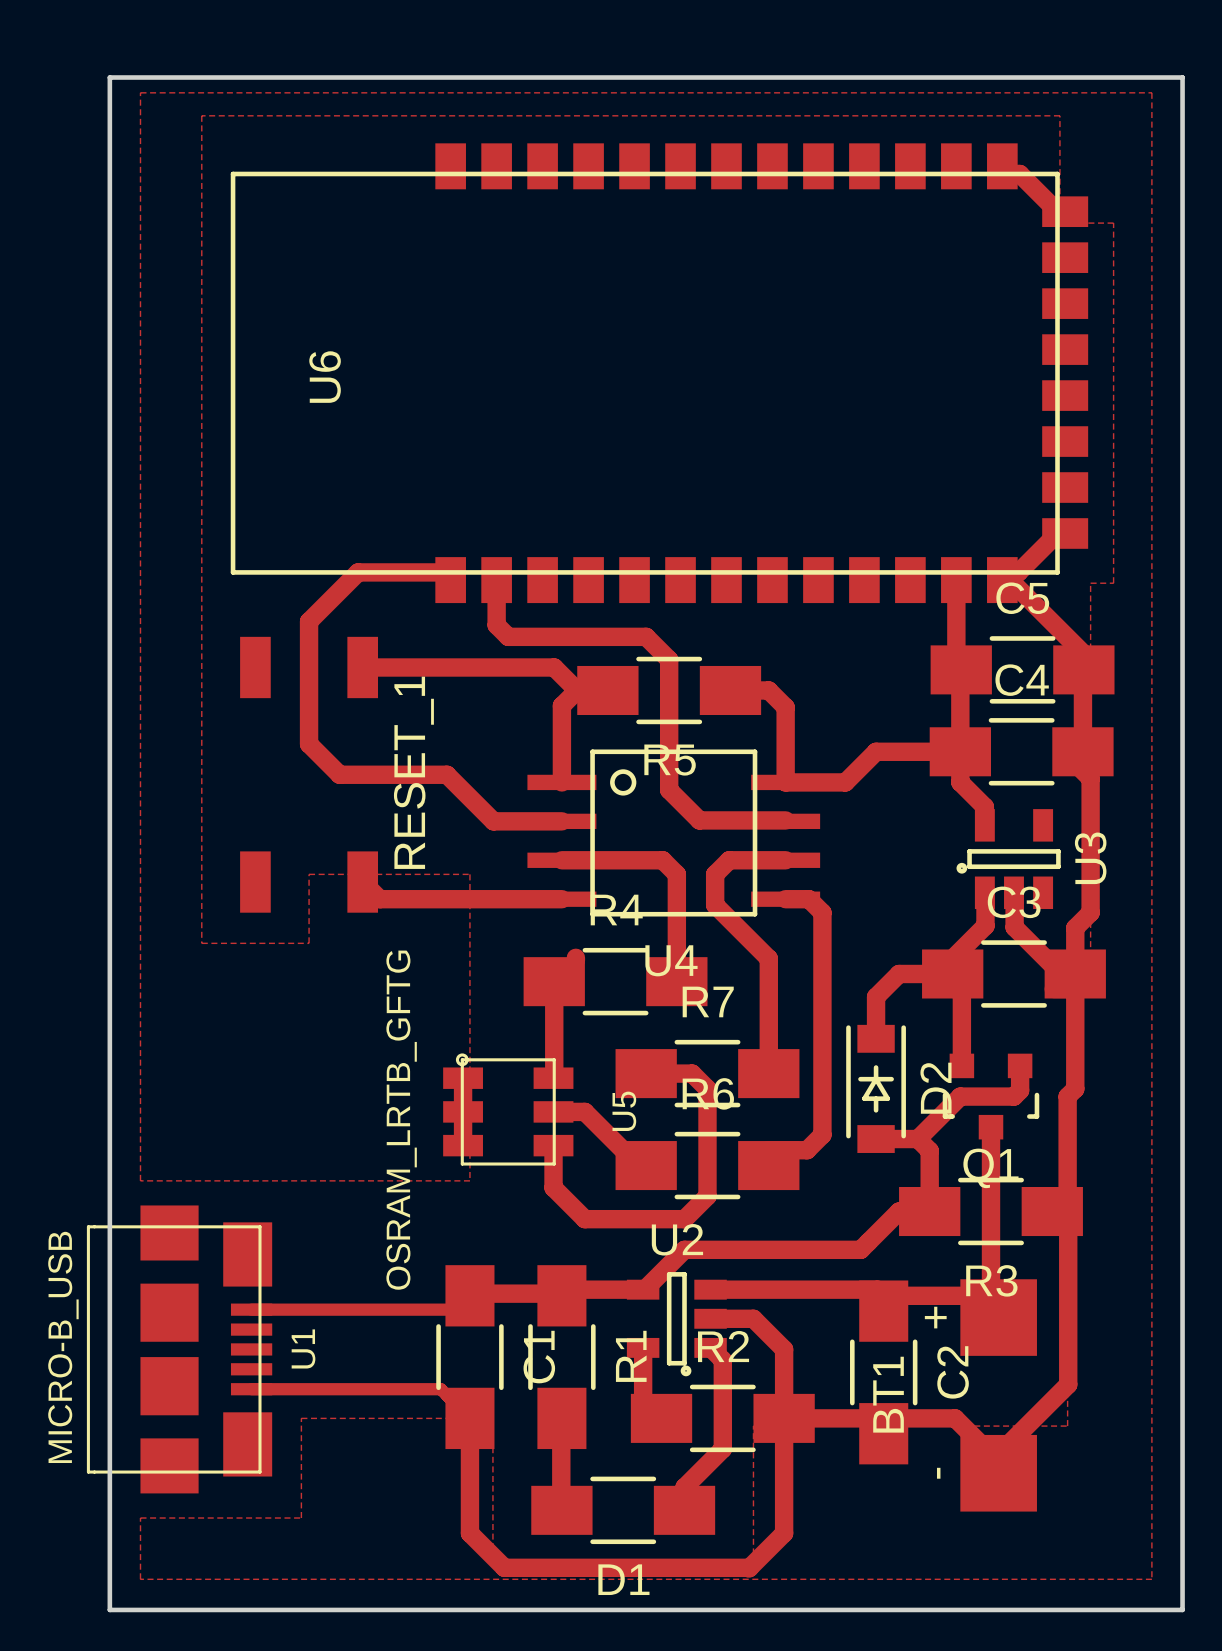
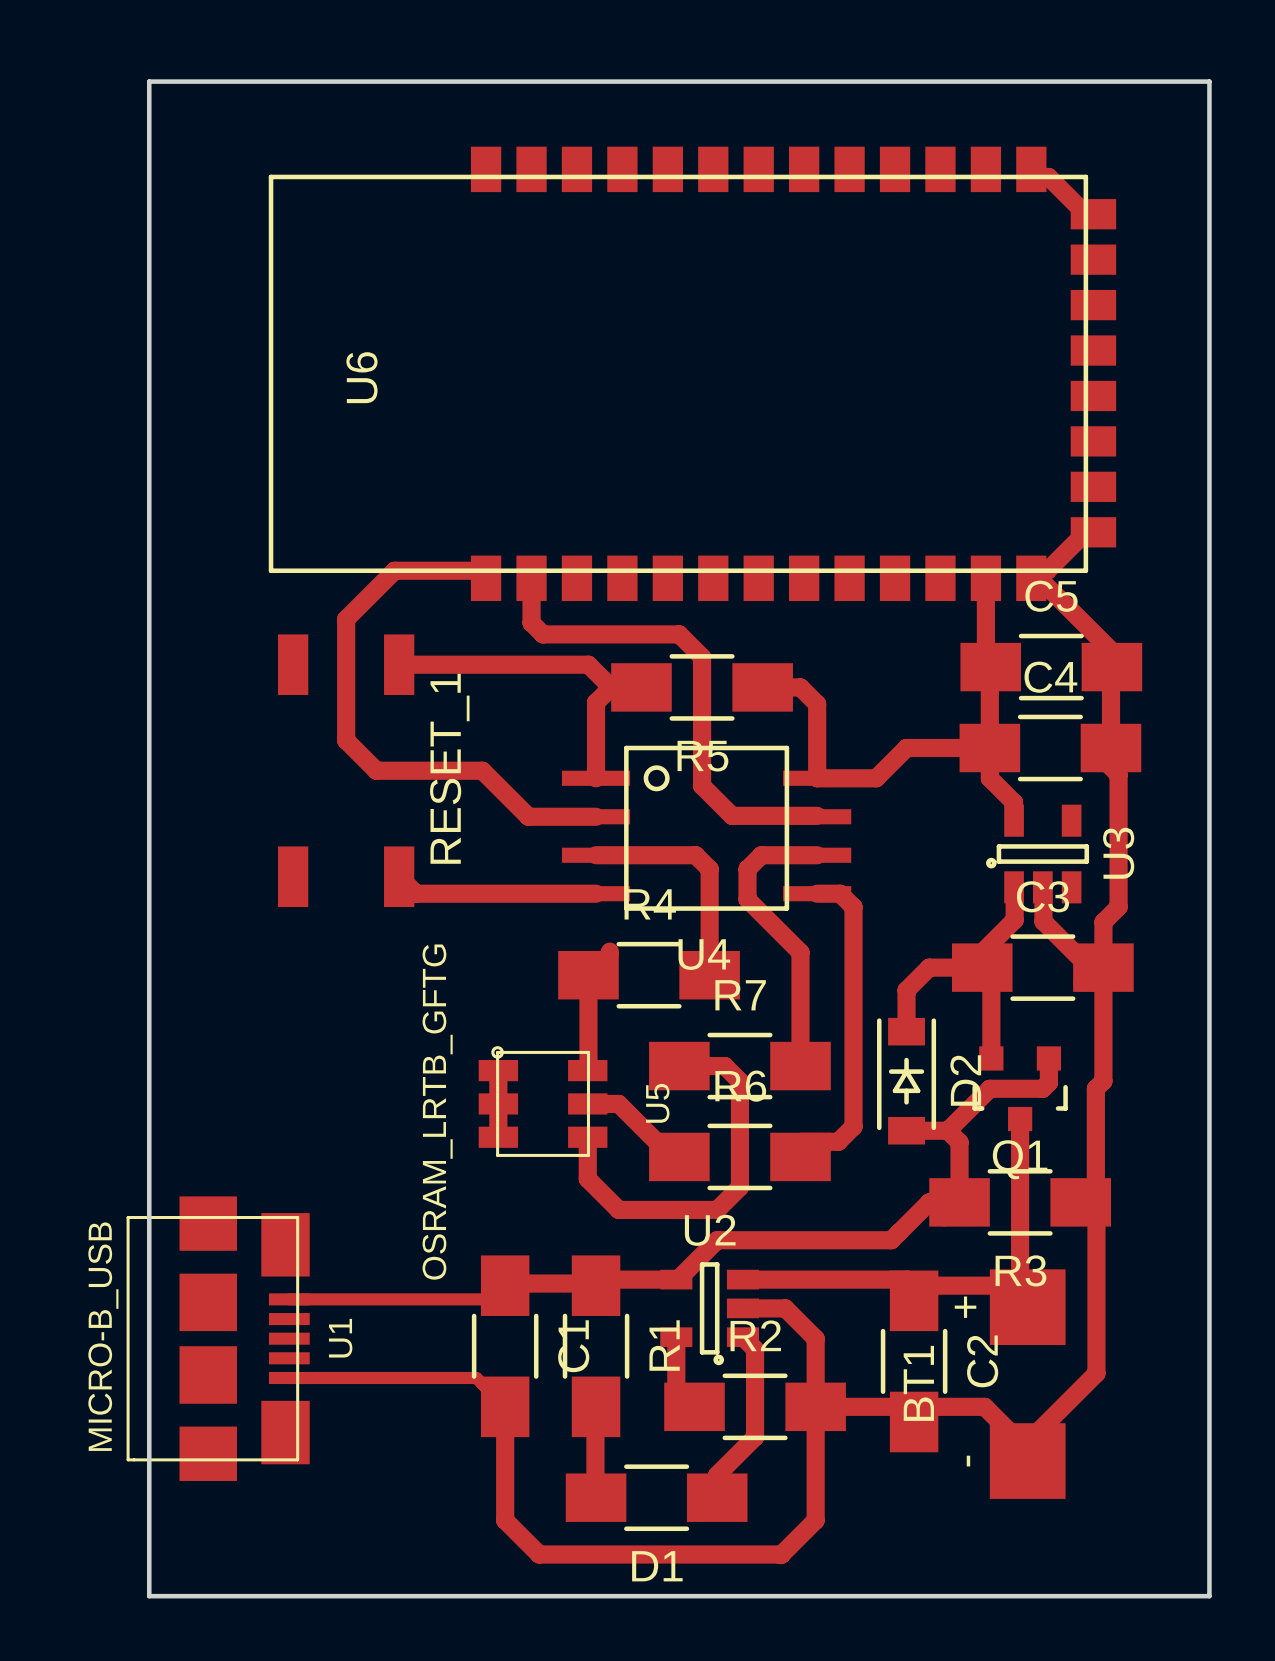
zone outline: (140, 92) (140, 1180) (469, 1180) (469, 874) (309, 874) (309, 943) (201, 943) (201, 115) (1059, 115) (1059, 223) (1113, 223) (1113, 583) (1090, 583) (1090, 966) (1067, 966) (1067, 1426) (753, 1426) (753, 1563) (492, 1563) (492, 1418) (301, 1418) (301, 1518) (140, 1518) (140, 1579) (1151, 1579) (1151, 92) (140, 92) -> none

